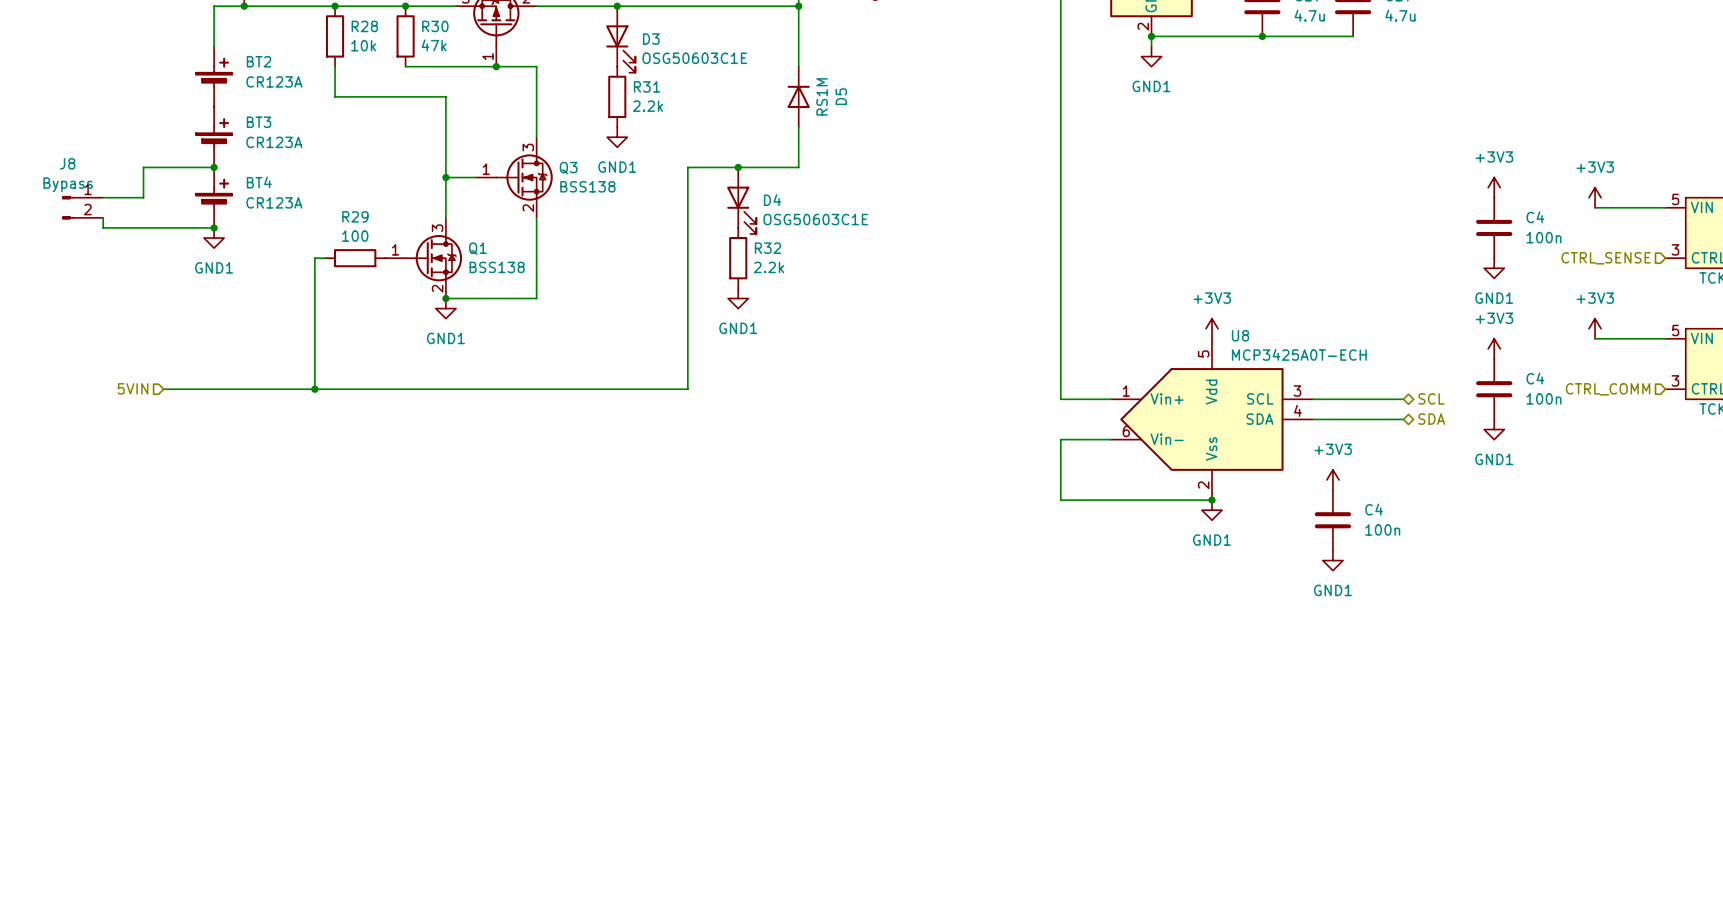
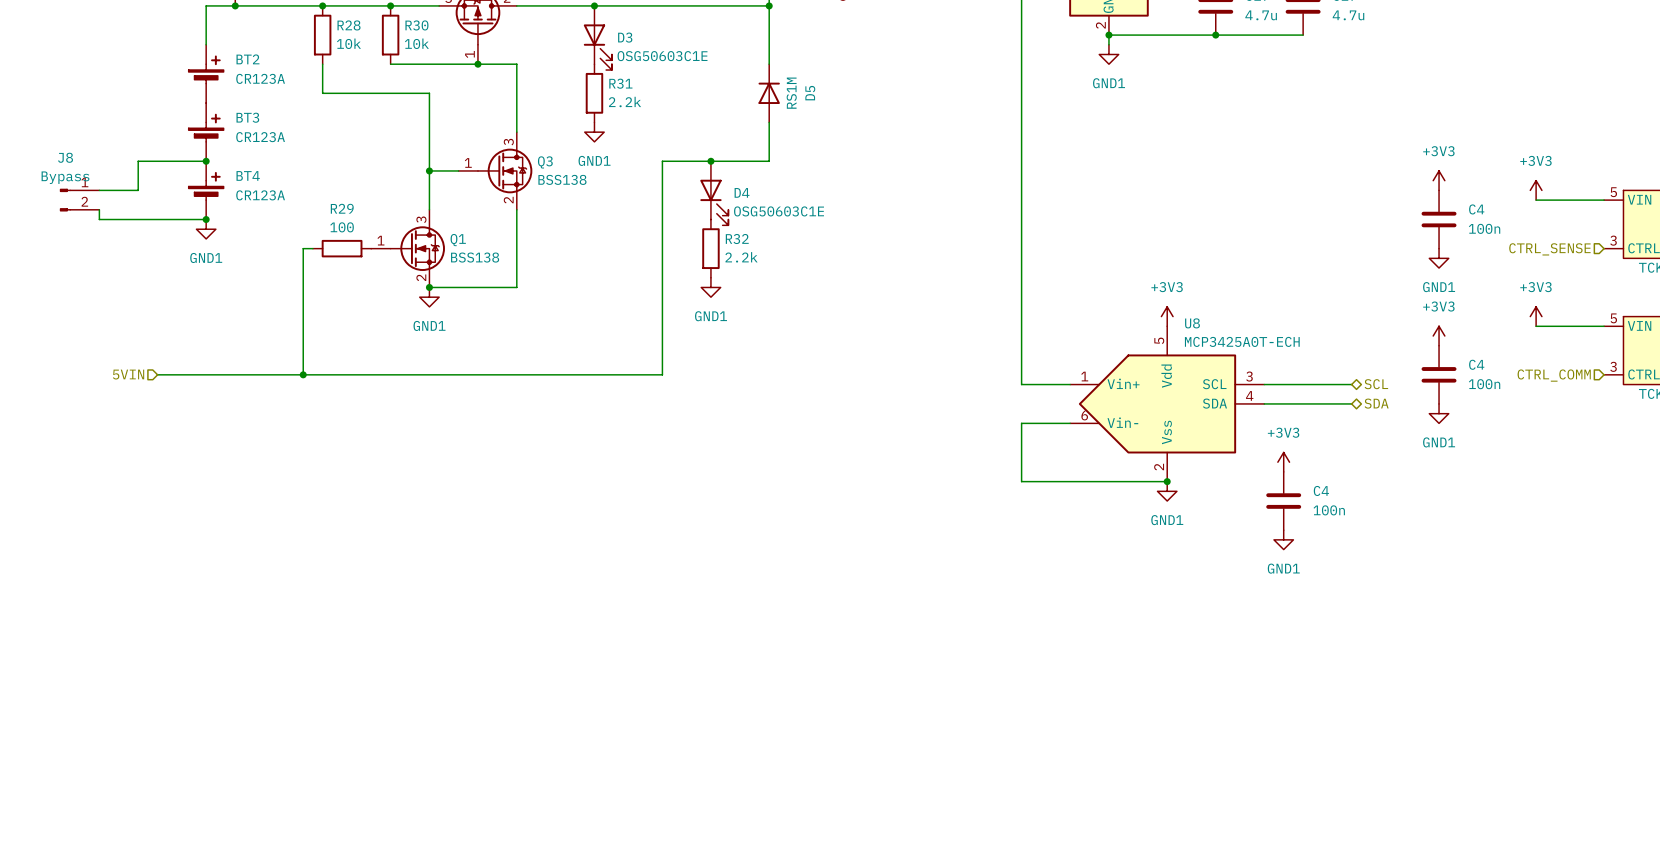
R30 value: 47k (434, 45) -> 10k (416, 43)

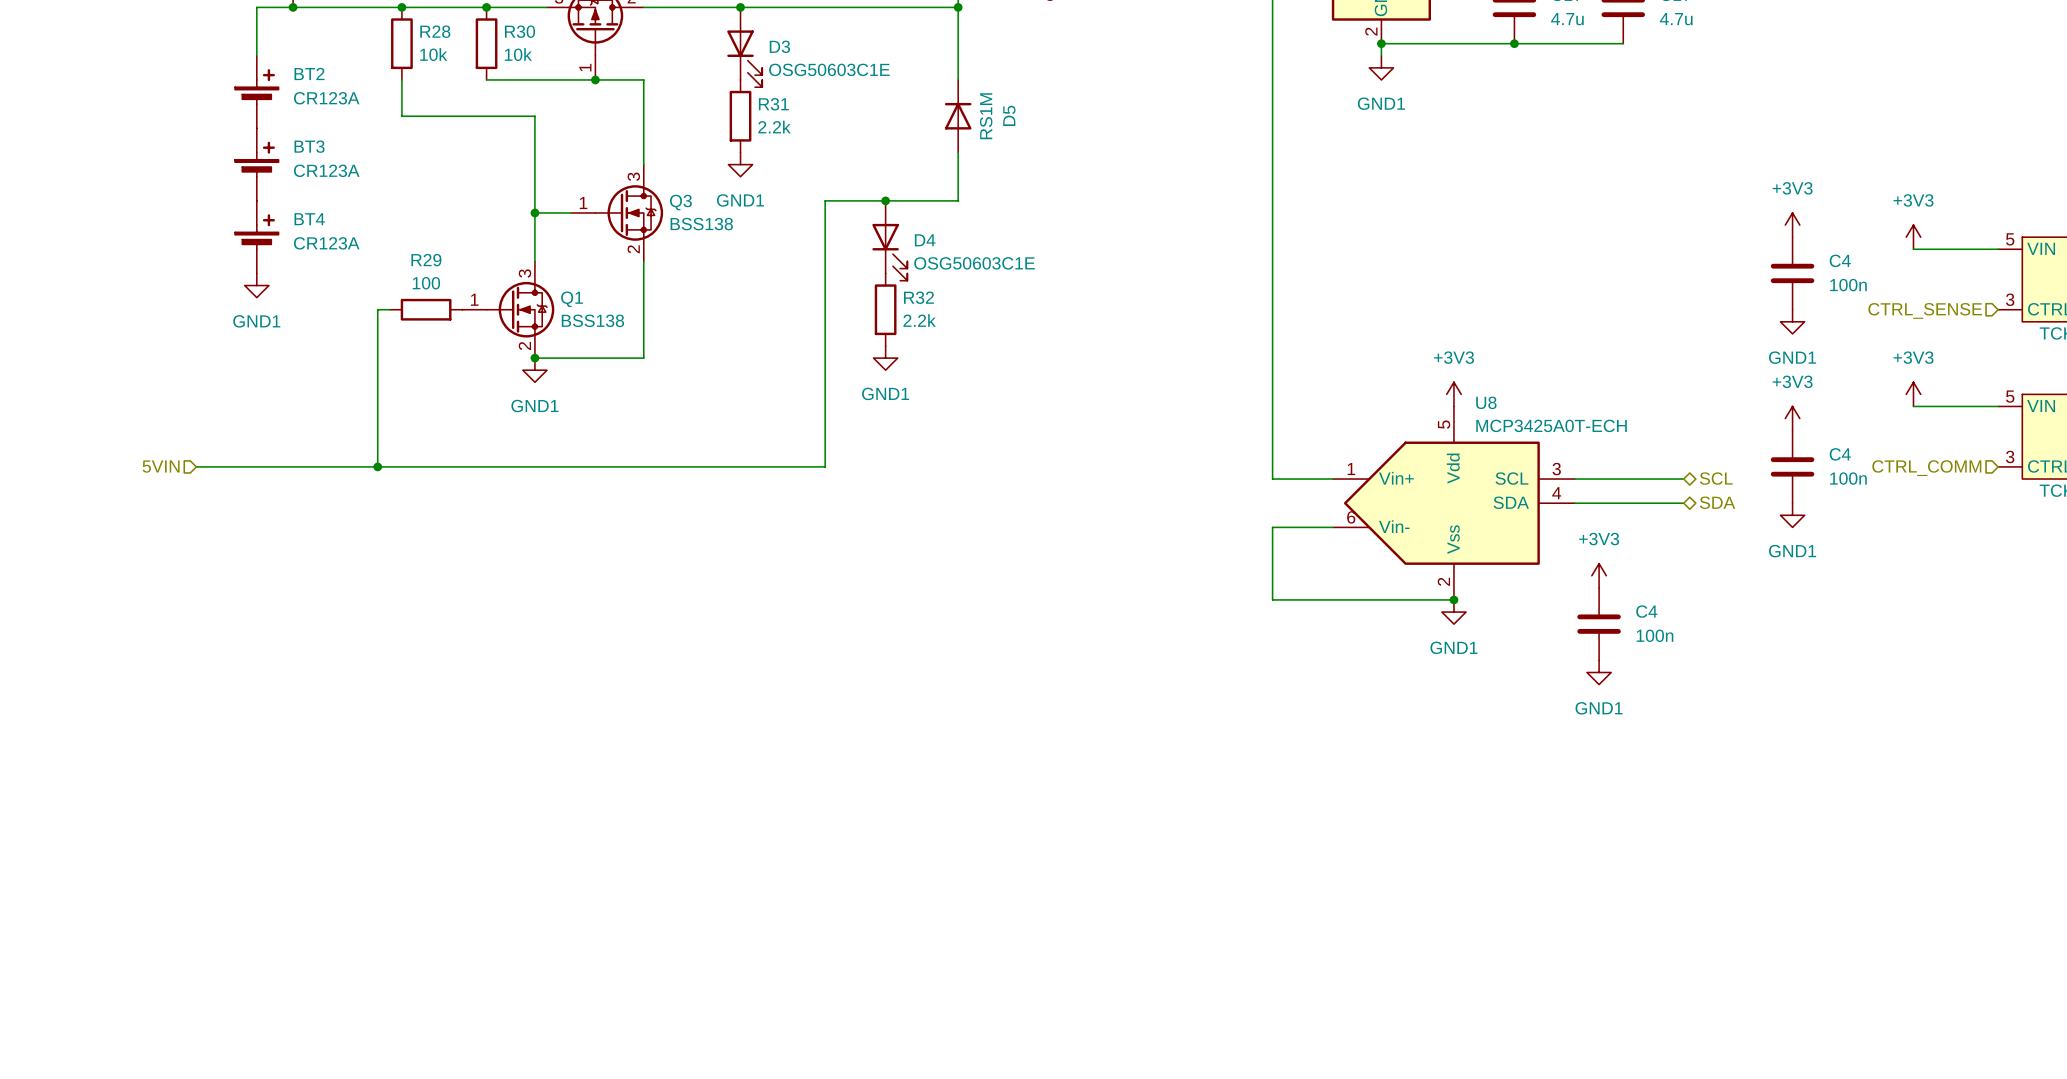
wire: (206, 161) (138, 161) (138, 190) (99, 190) -> none
junction: (206, 161) -> none
J8: Bypass (79, 200) -> none
wire: (99, 209) (99, 219) (206, 219) -> none
junction: (206, 219) -> none

